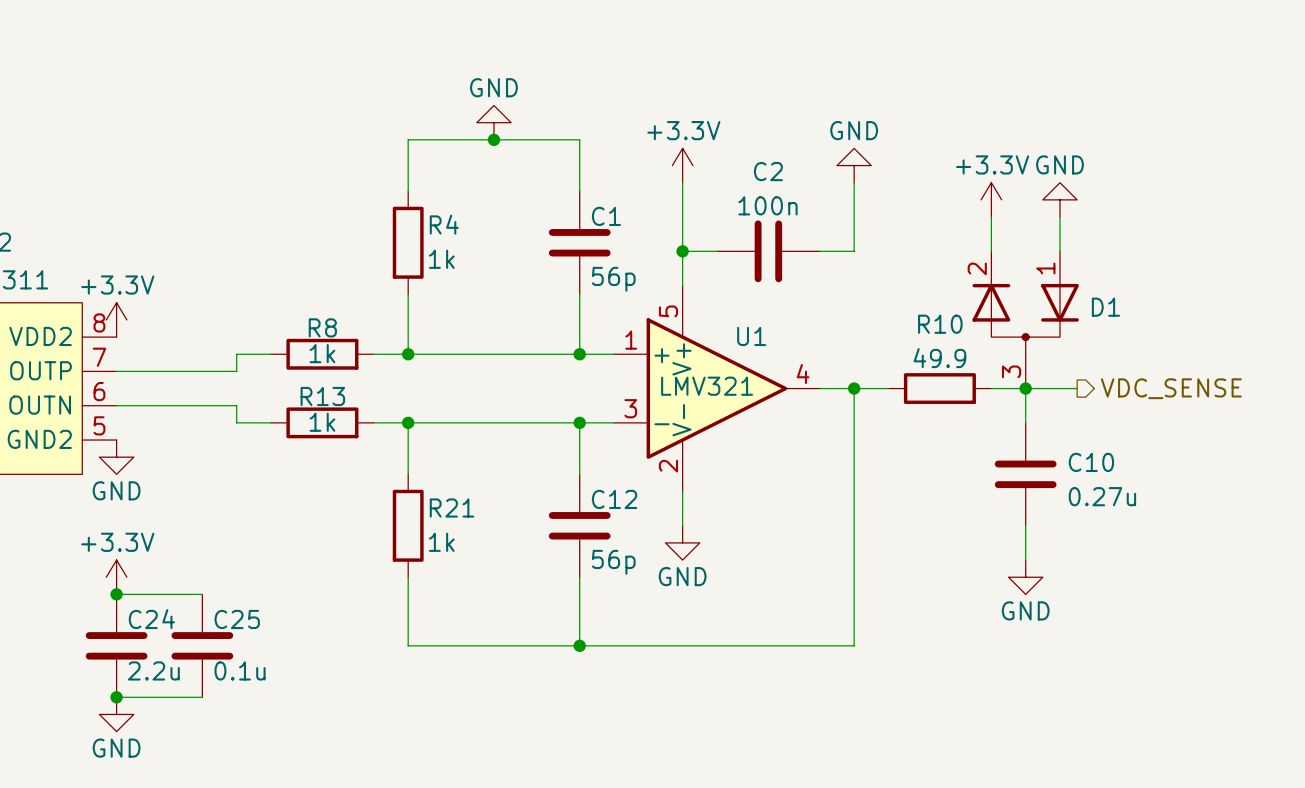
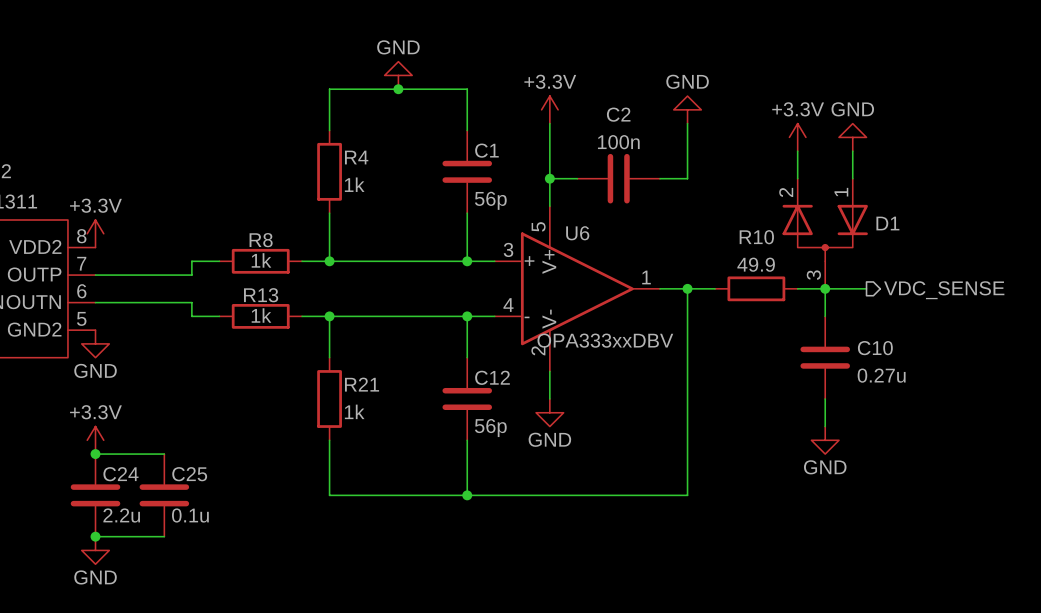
U1 name: U1 (751, 336) -> U6 (577, 233)
U1 pin number: 1 (631, 340) -> 3 (508, 249)
U1 pin number: 4 (803, 374) -> 1 (646, 277)
U1 text: LMV321 (707, 386) -> none
U1 pin number: 3 (630, 408) -> 4 (508, 305)
U1 value: none -> OPA333xxDBV (605, 340)

